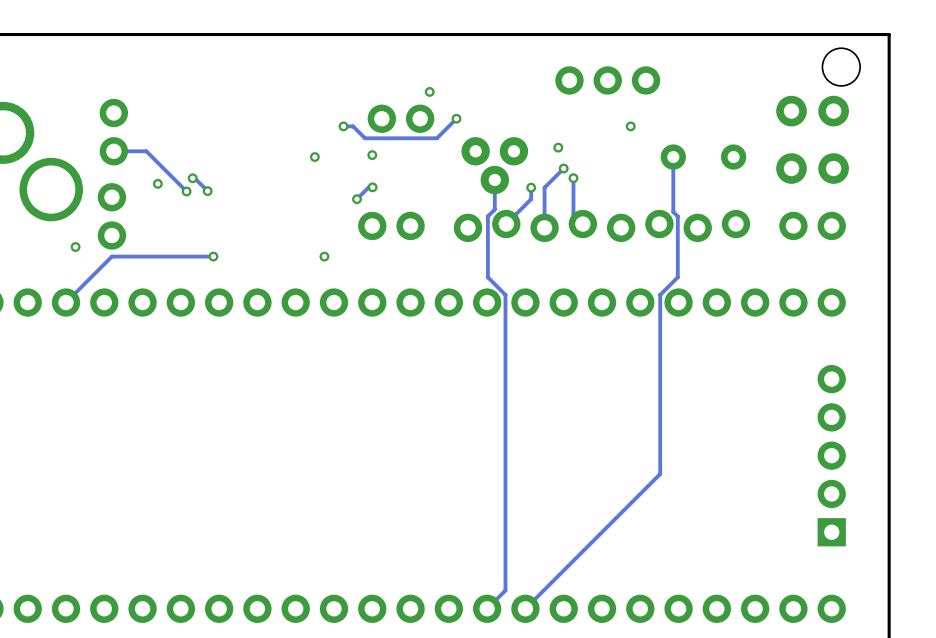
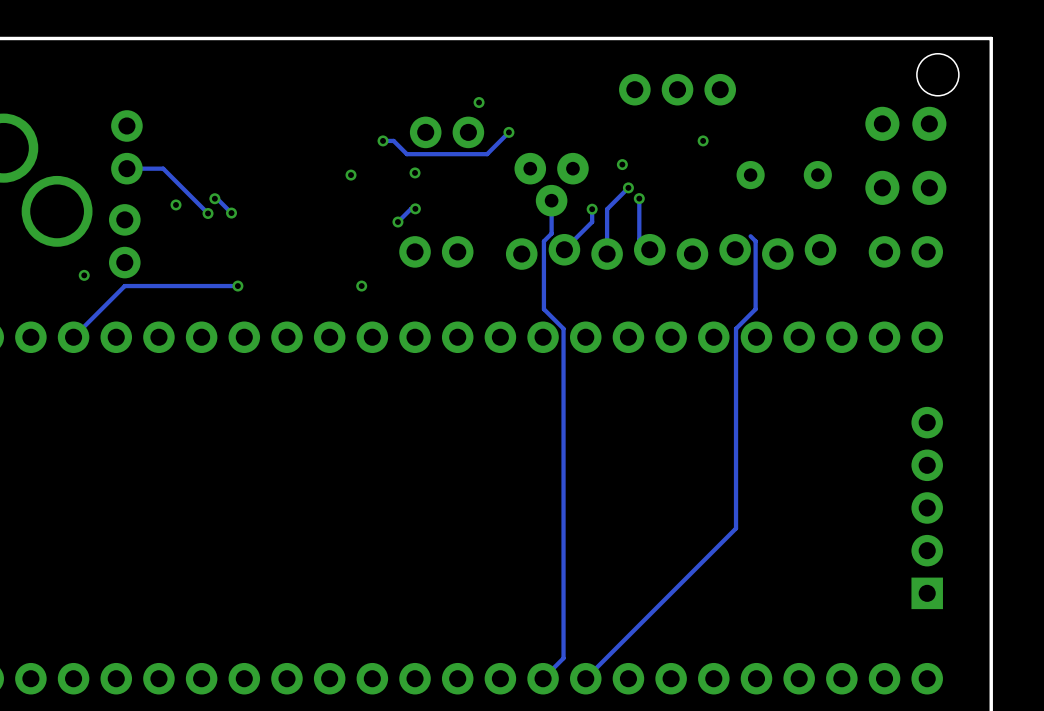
track: (673, 157) (673, 211) -> none

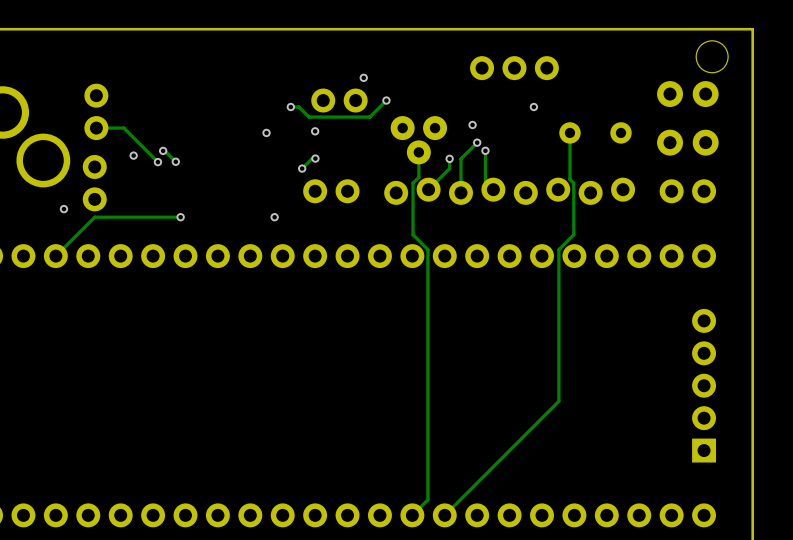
track: none -> (569, 132) (569, 179)

